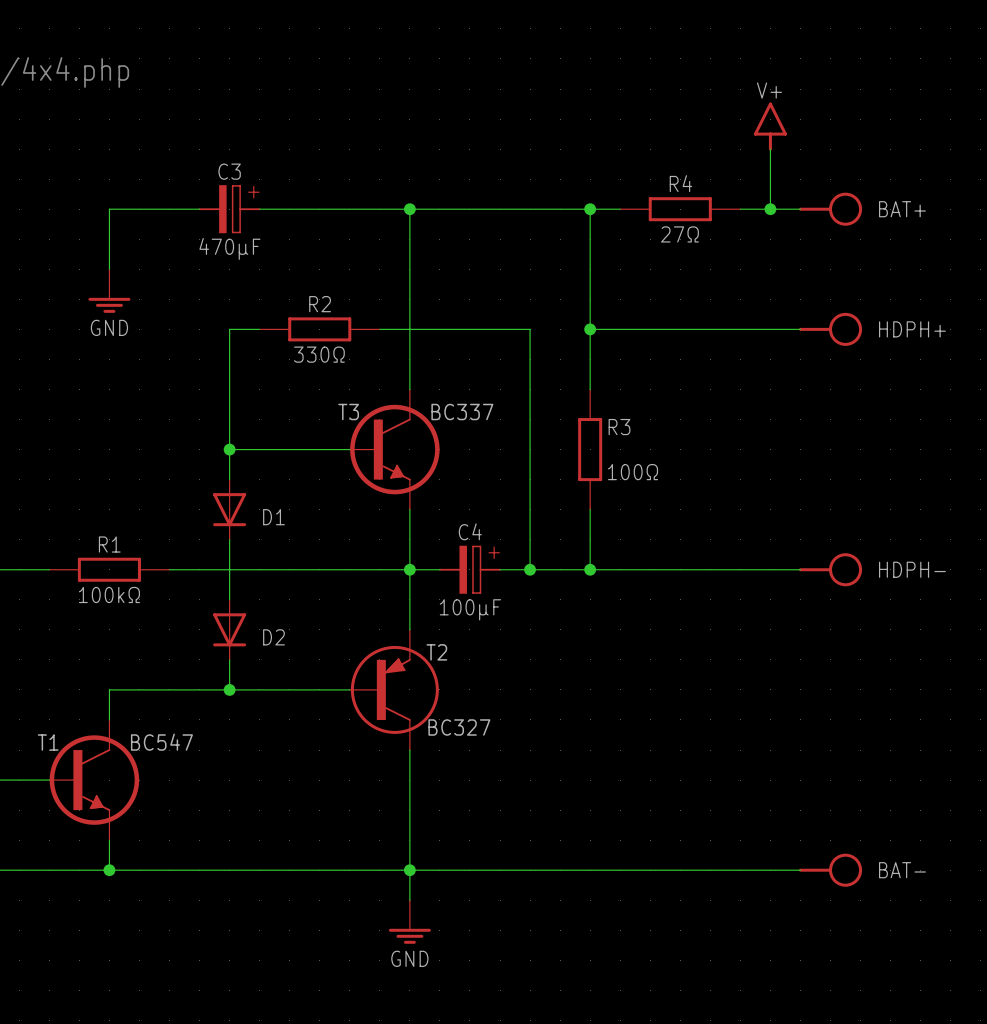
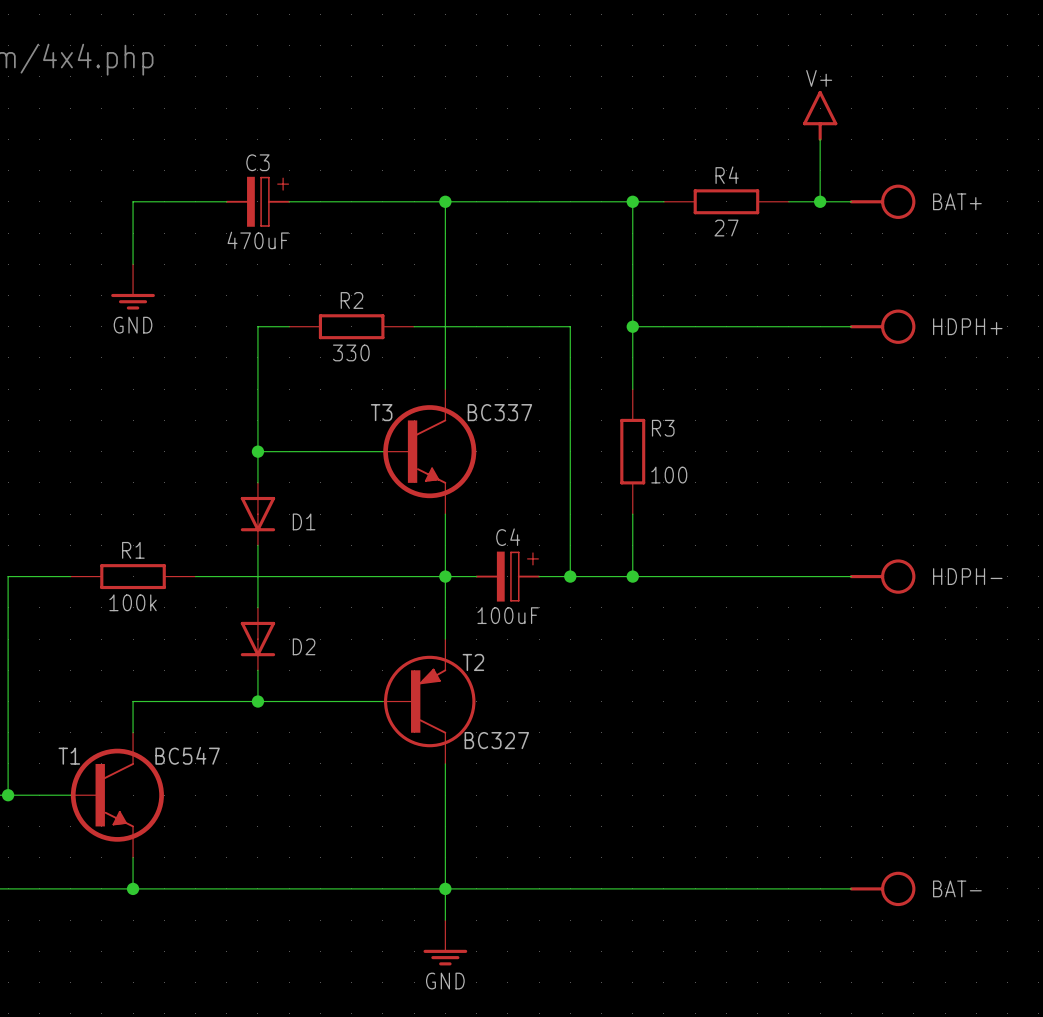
R4 value: 27Ω (679, 234) -> 27 (726, 228)
C3 value: 470μF (229, 248) -> 470uF (258, 240)
R2 value: 330Ω (319, 354) -> 330 (351, 352)
R3 value: 100Ω (633, 472) -> 100 (669, 475)
R1 value: 100kΩ (109, 594) -> 100k (133, 602)
C4 value: 100μF (470, 609) -> 100uF (508, 615)

